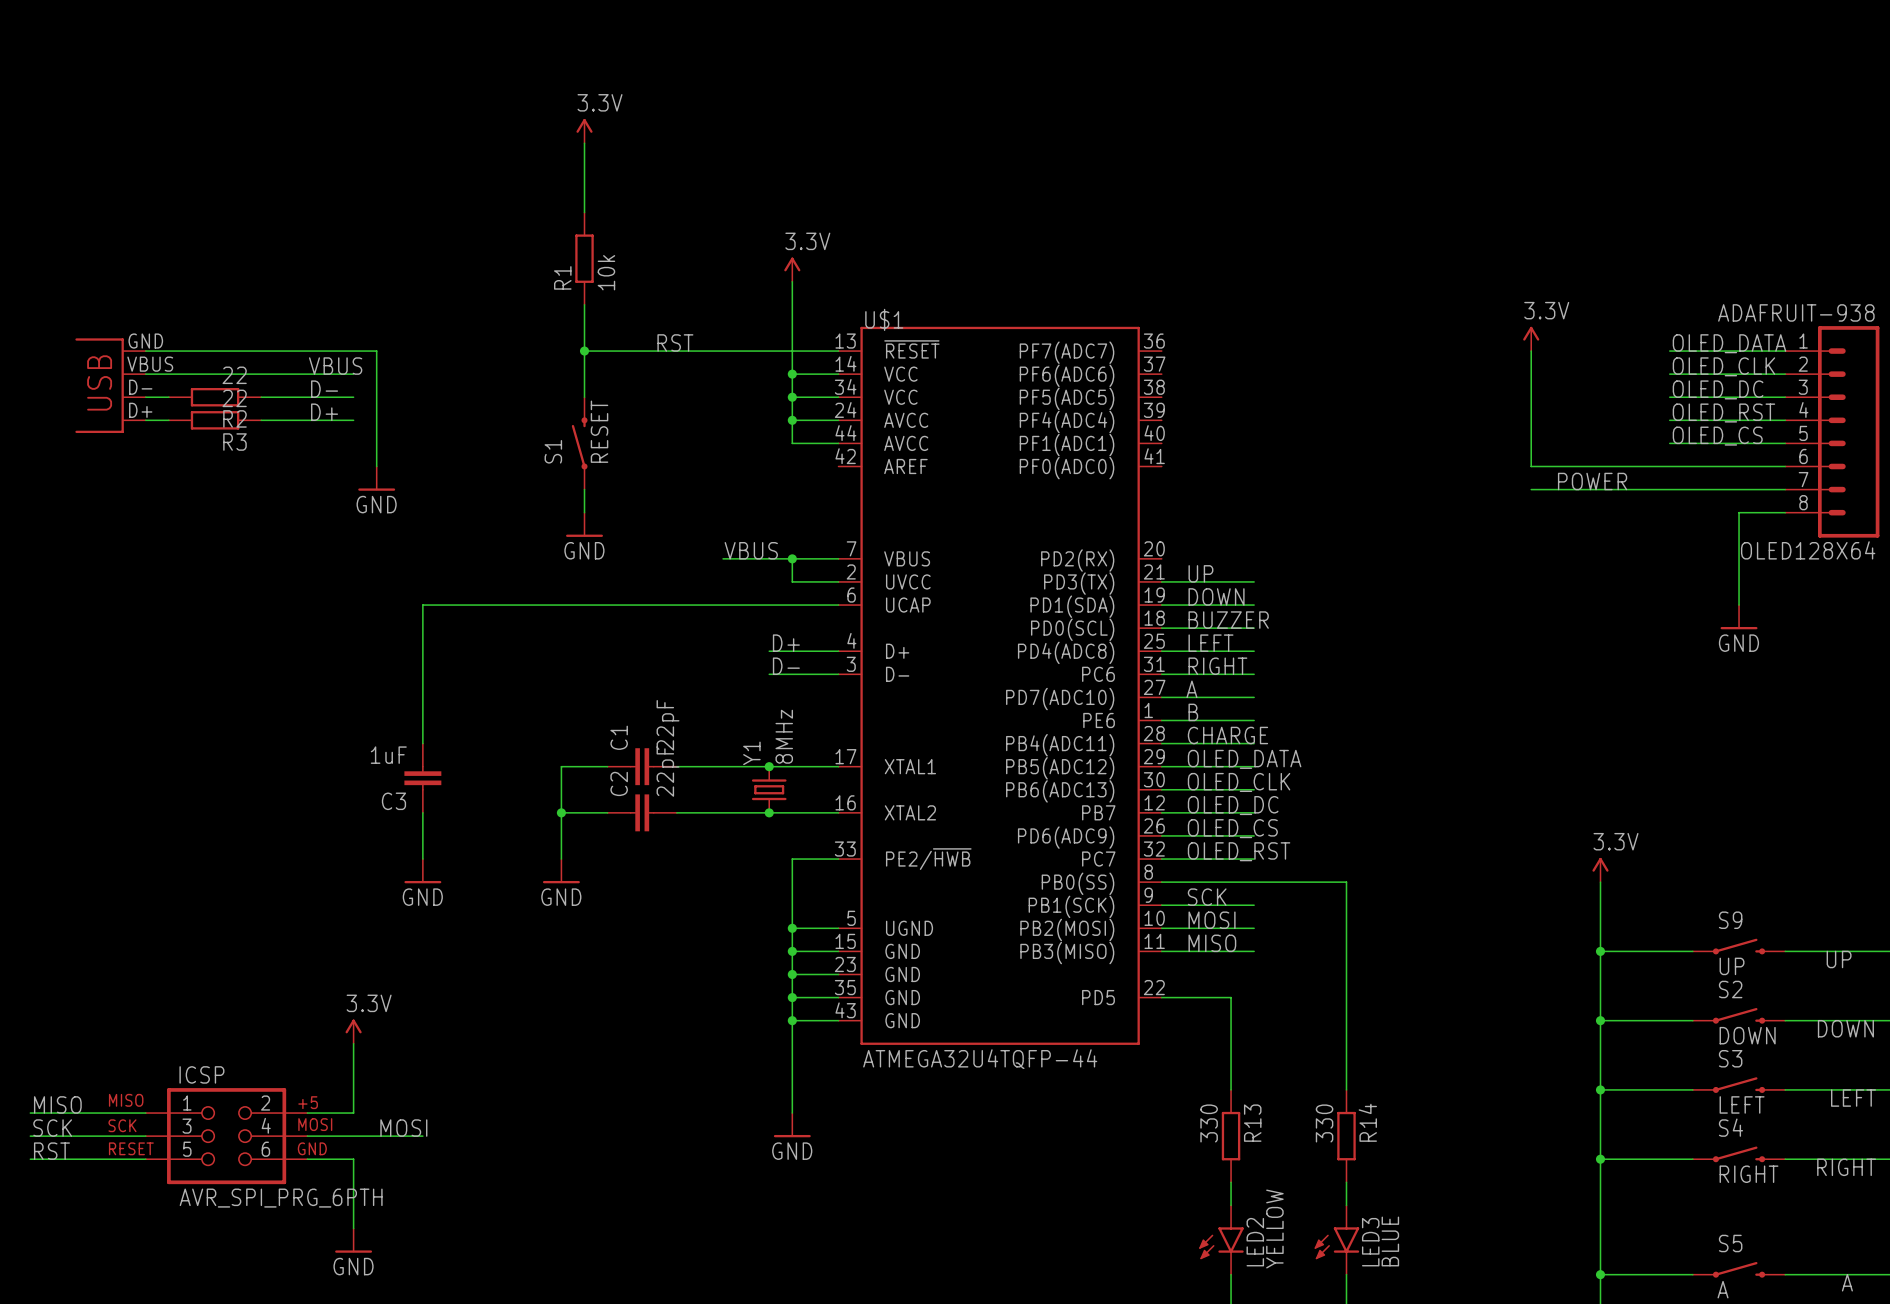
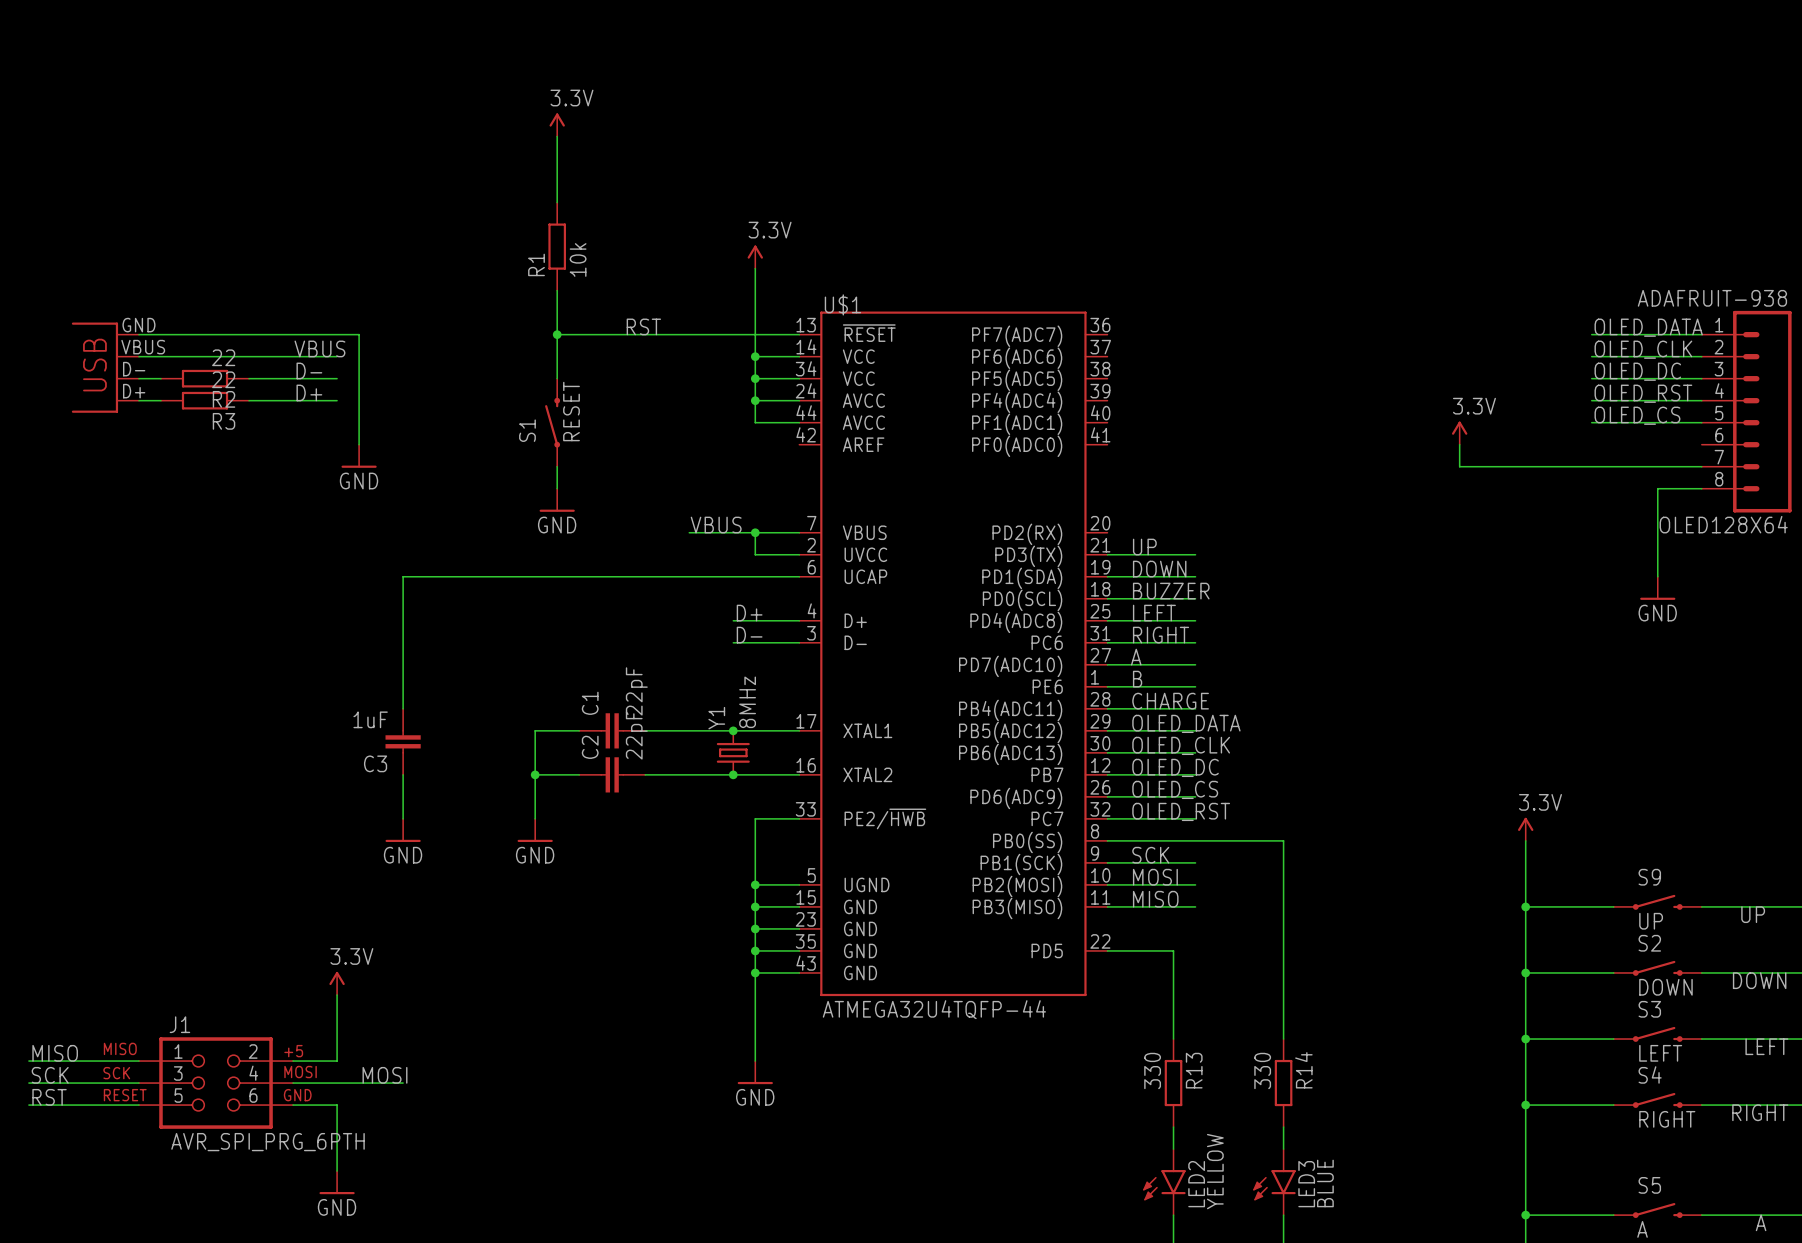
power symbol position: 3.3V (1531, 338) -> 3.3V (1459, 433)
wire: (1531, 351) (1531, 466) (1785, 466) -> none
wire: none -> (1459, 444) (1459, 466)
label: POWER (1592, 481) -> none
ICSP name: ICSP (201, 1074) -> J1 (179, 1024)

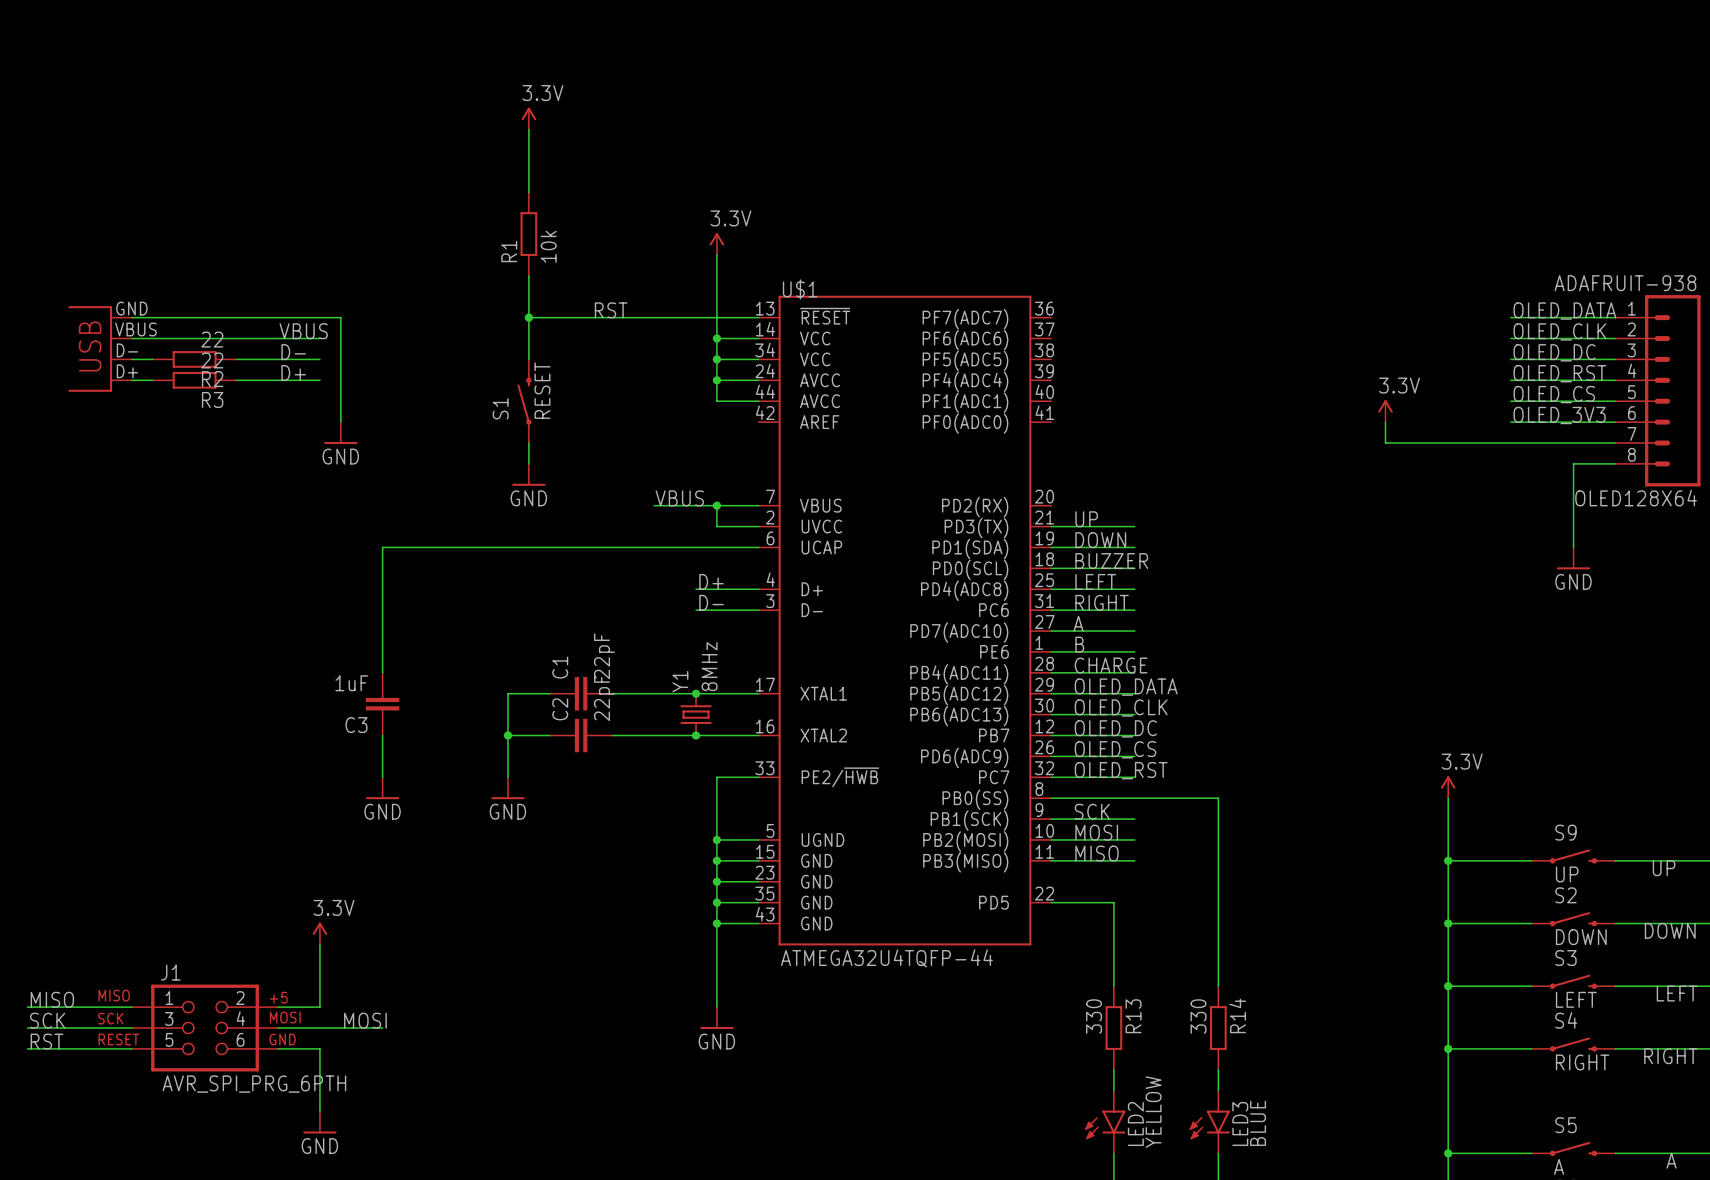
label: none -> OLED_3V3 (1559, 415)
wire: none -> (1510, 422) (1615, 422)

